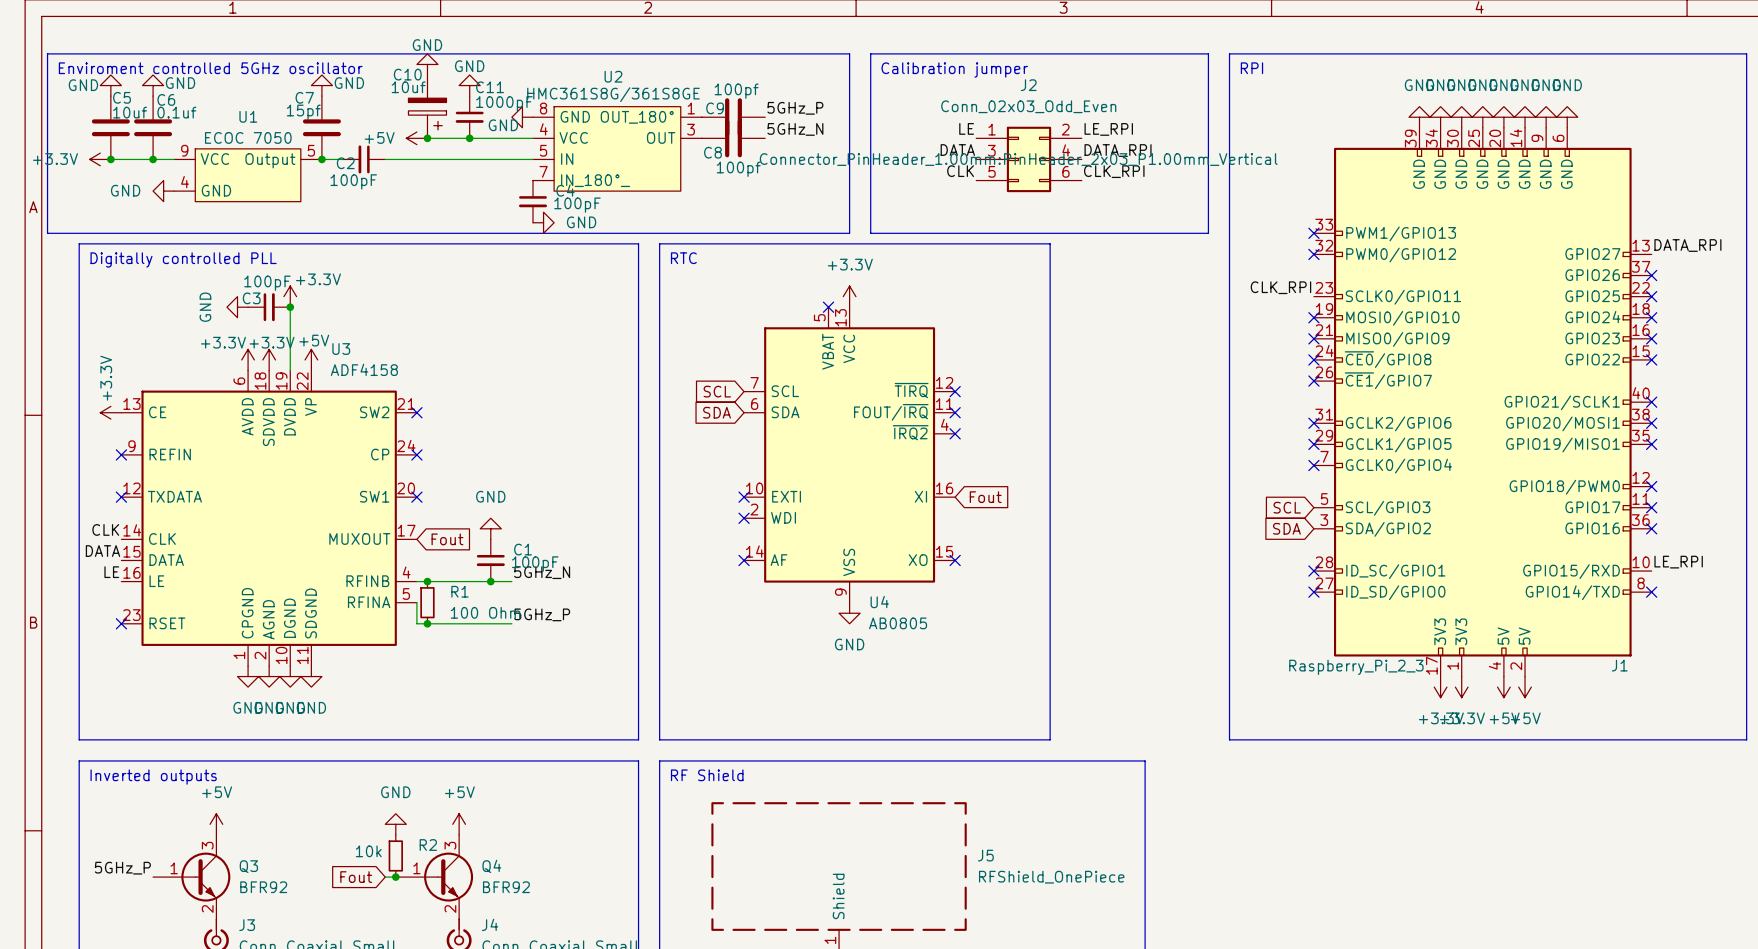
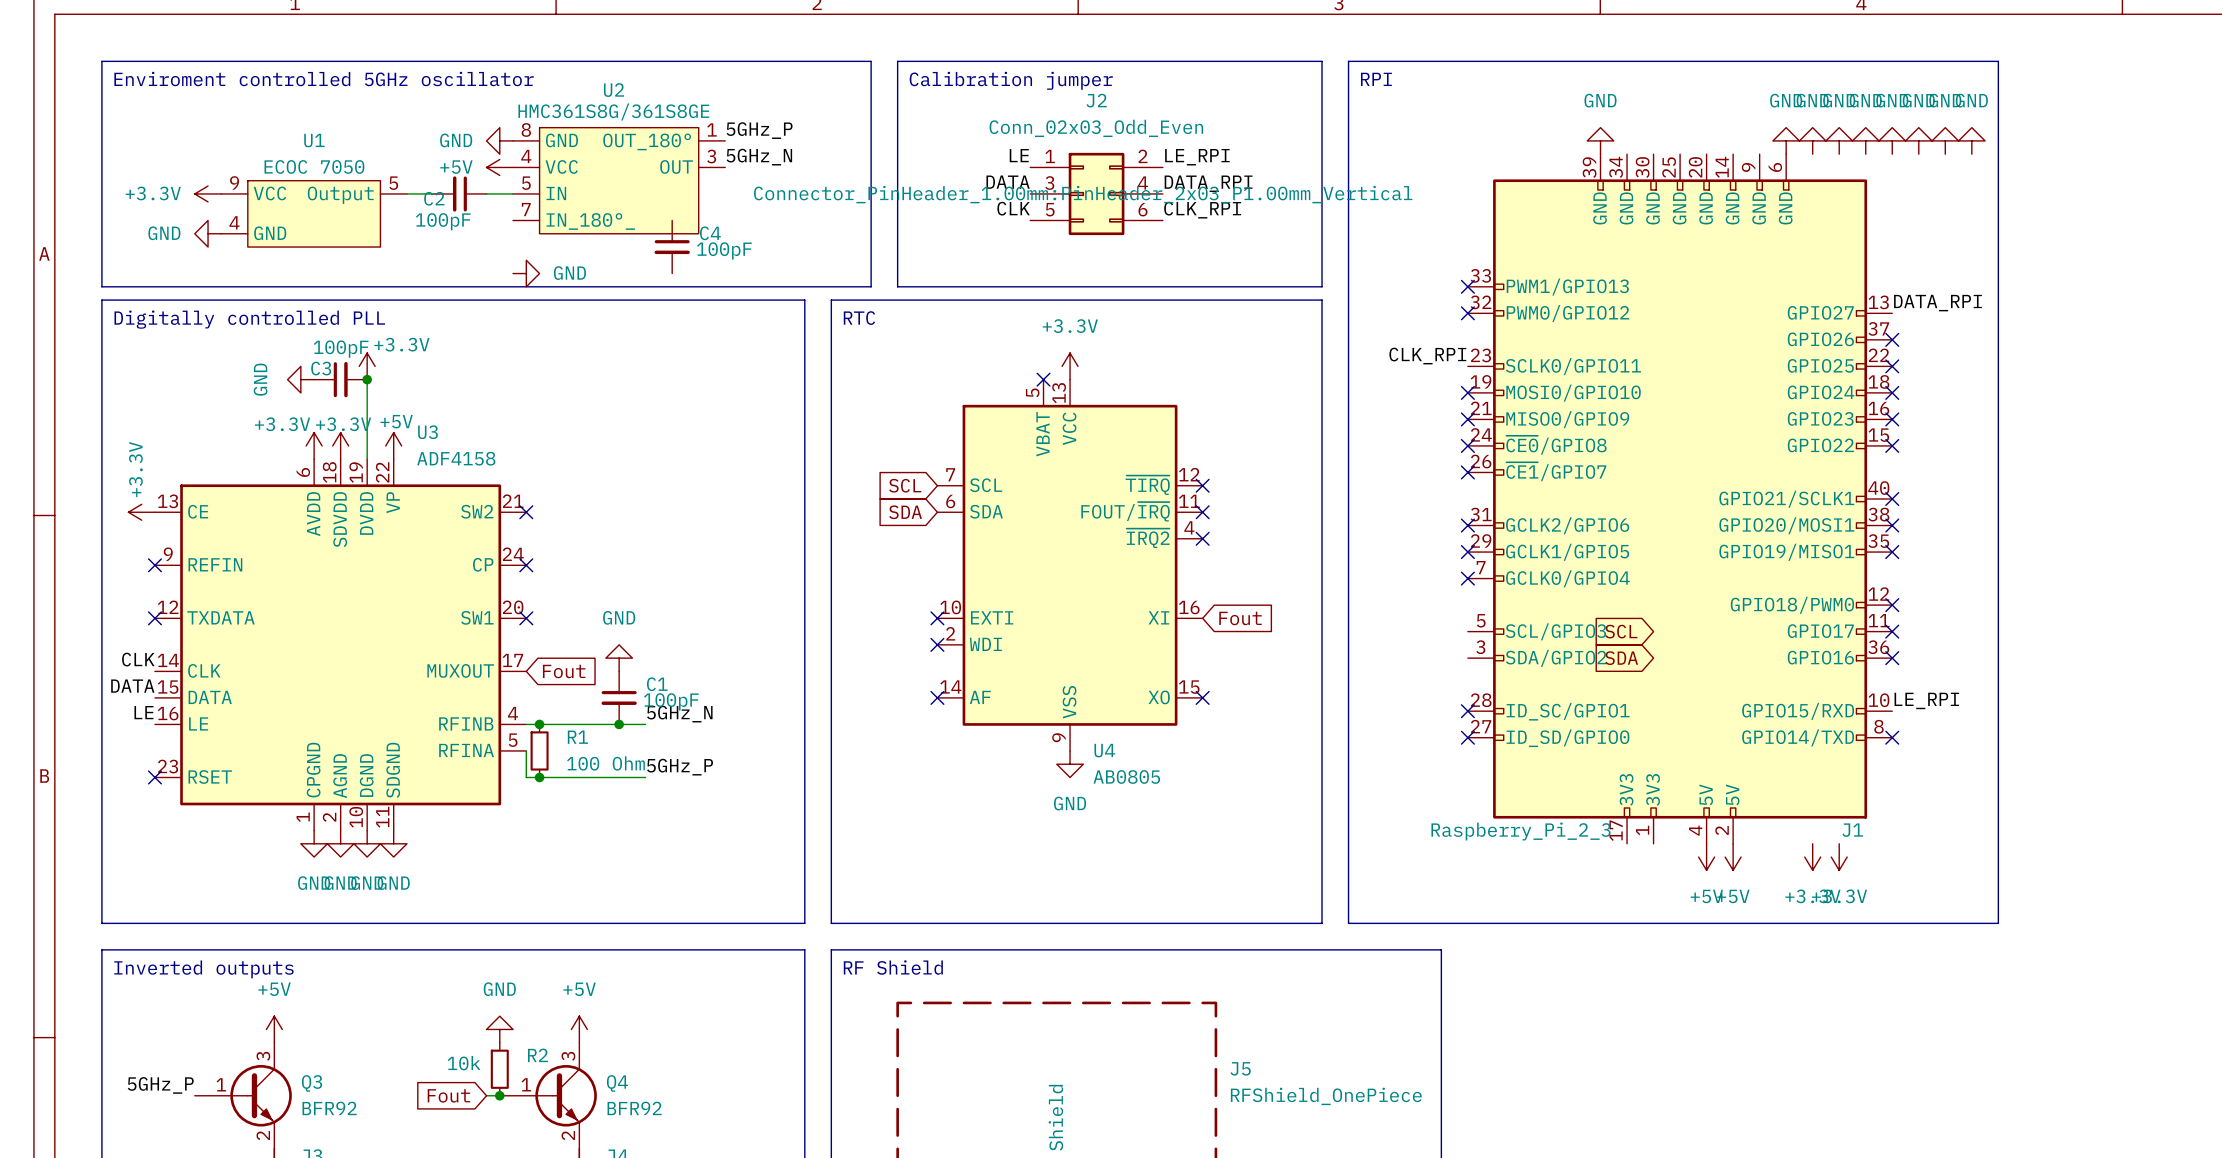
line: (79, 53) (47, 53) (47, 233) (79, 233) -> (101, 61) (101, 286)
line: (691, 53) (712, 53) -> (871, 61) (871, 286)
line: (849, 53) (849, 233) -> (1070, 61) (1096, 61)
line: (870, 53) (870, 233) -> (1070, 286) (1096, 286)
line: (1050, 53) (1071, 53) -> (1520, 61) (1547, 61)
line: (1208, 53) (1208, 233) (1050, 233) -> (1322, 61) (1322, 286)
line: (1229, 53) (1229, 739) -> (1348, 61) (1348, 923) (1547, 923)
line: (1588, 53) (1746, 53) (1746, 739) (1588, 739) -> (1998, 61) (1998, 923)
power symbol: GND (427, 64) -> none
text position: Enviroment controlled 5GHz oscillator (210, 68) -> Enviroment controlled 5GHz oscillator (324, 79)
text position: RPI (1251, 68) -> RPI (1376, 79)
text position: Calibration jumper (954, 69) -> Calibration jumper (1011, 80)
power symbol: GND (110, 85) -> none
power symbol: GND (153, 85) -> none
power symbol: GND (321, 85) -> none
power symbol: GND (469, 85) -> none
C10: 10uf (427, 106) -> none
label position: 5GHz_P (795, 108) -> 5GHz_P (759, 130)
power symbol: none -> GND (499, 140)
C11: 1000pF (469, 117) -> none
power symbol: GND (522, 117) -> none
C9: 100pf (733, 117) -> none
power symbol: none -> GND (1600, 140)
C5: 10uf (110, 127) -> none
C6: 0.1uf (153, 127) -> none
C7: 15pf (321, 127) -> none
label position: LE (966, 128) -> LE (1019, 155)
label position: 5GHz_N (795, 129) -> 5GHz_N (759, 157)
label position: LE_RPI (1108, 129) -> LE_RPI (1197, 157)
power symbol position: +5V (416, 138) -> +5V (499, 167)
junction: (427, 138) -> none
junction: (469, 138) -> none
C8: 100pf (733, 138) -> none
U2 position: (617, 148) -> (619, 180)
label position: DATA (957, 150) -> DATA (1008, 182)
label position: DATA_RPI (1118, 150) -> DATA_RPI (1208, 183)
power symbol position: +3.3V (100, 159) -> +3.3V (208, 193)
wire: (110, 159) (174, 159) -> none
junction: (110, 159) -> none
junction: (153, 159) -> none
junction: (321, 159) -> none
J2 position: (1029, 159) -> (1096, 193)
label: none -> CLK_RPI (1202, 210)
label position: CLK (960, 171) -> CLK (1013, 208)
label: CLK_RPI (1114, 171) -> none
power symbol: none -> GND (526, 273)
power symbol: GND (543, 222) -> none
line: (691, 233) (712, 233) -> (897, 61) (897, 286)
no-connect mark: none -> (1467, 286)
no-connect mark: (1313, 233) -> none
label position: DATA_RPI (1687, 245) -> DATA_RPI (1937, 303)
no-connect mark: none -> (1467, 313)
no-connect mark: (1313, 254) -> none
no-connect mark: none -> (1892, 339)
no-connect mark: (1651, 275) -> none
label: none -> CLK_RPI (1427, 356)
label: CLK_RPI (1280, 287) -> none
no-connect mark: none -> (1892, 366)
no-connect mark: (1651, 296) -> none
no-connect mark: none -> (1467, 392)
no-connect mark: (1313, 317) -> none
no-connect mark: none -> (1892, 392)
no-connect mark: (1651, 317) -> none
no-connect mark: none -> (1467, 419)
no-connect mark: (1313, 338) -> none
no-connect mark: none -> (1892, 419)
no-connect mark: (1651, 338) -> none
no-connect mark: none -> (1467, 445)
no-connect mark: (1313, 359) -> none
no-connect mark: none -> (1892, 445)
no-connect mark: (1651, 359) -> none
no-connect mark: none -> (1467, 472)
no-connect mark: (1313, 381) -> none
J1 position: (1482, 402) -> (1680, 498)
no-connect mark: none -> (1892, 498)
no-connect mark: (1651, 402) -> none
no-connect mark: none -> (1467, 525)
no-connect mark: (1313, 423) -> none
no-connect mark: none -> (1892, 525)
no-connect mark: (1651, 423) -> none
no-connect mark: none -> (1467, 552)
no-connect mark: (1313, 444) -> none
no-connect mark: none -> (1892, 552)
no-connect mark: (1651, 444) -> none
no-connect mark: none -> (1467, 578)
no-connect mark: (1313, 465) -> none
no-connect mark: none -> (1892, 605)
no-connect mark: (1651, 486) -> none
no-connect mark: none -> (1892, 631)
no-connect mark: (1651, 507) -> none
no-connect mark: none -> (1892, 658)
no-connect mark: (1651, 528) -> none
label position: LE_RPI (1678, 562) -> LE_RPI (1926, 700)
no-connect mark: none -> (1467, 711)
no-connect mark: (1313, 571) -> none
no-connect mark: none -> (1467, 737)
no-connect mark: (1313, 592) -> none
no-connect mark: none -> (1892, 737)
no-connect mark: (1651, 592) -> none
power symbol: none -> +5V (1706, 857)
power symbol: none -> +5V (1733, 857)
power symbol: +5V (1503, 687) -> none
power symbol: +5V (1525, 687) -> none

